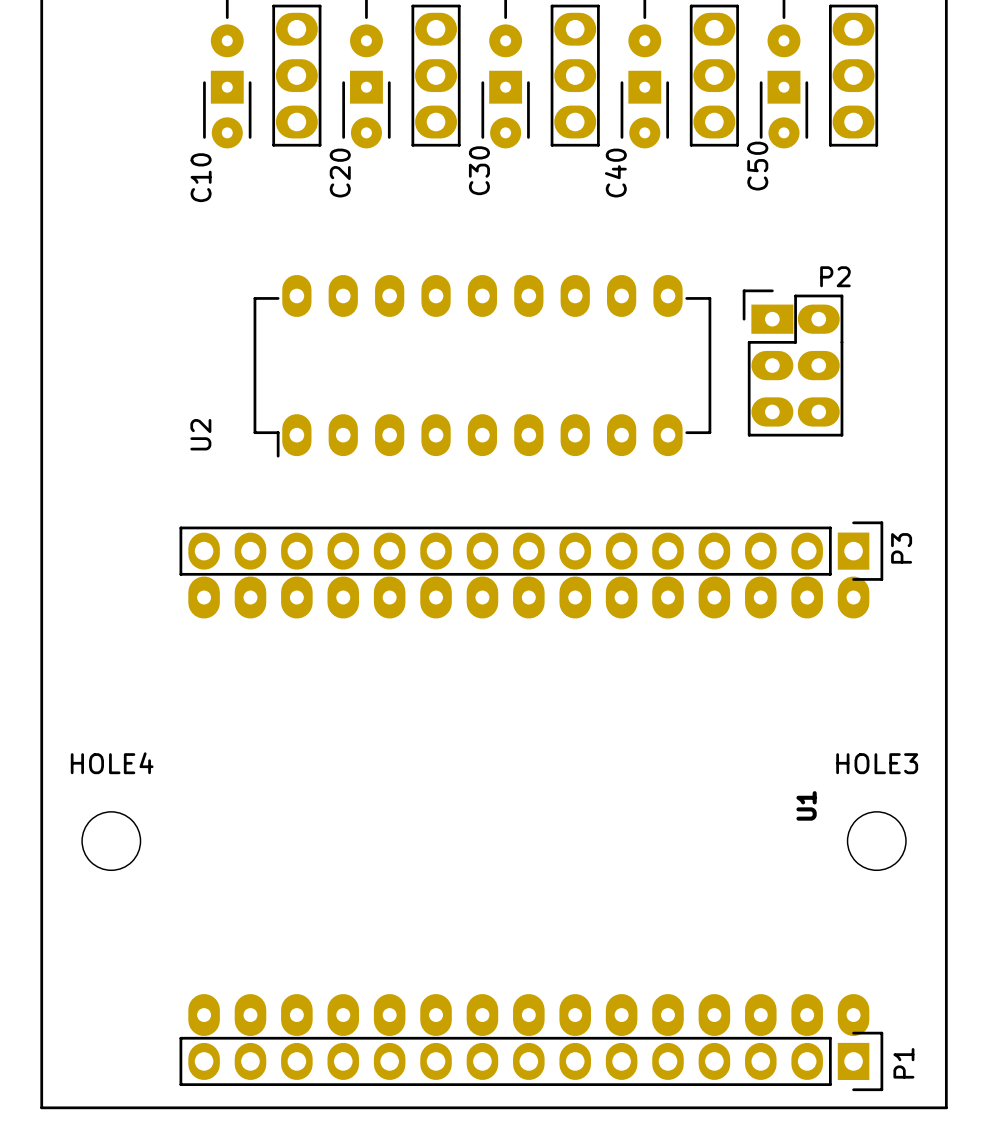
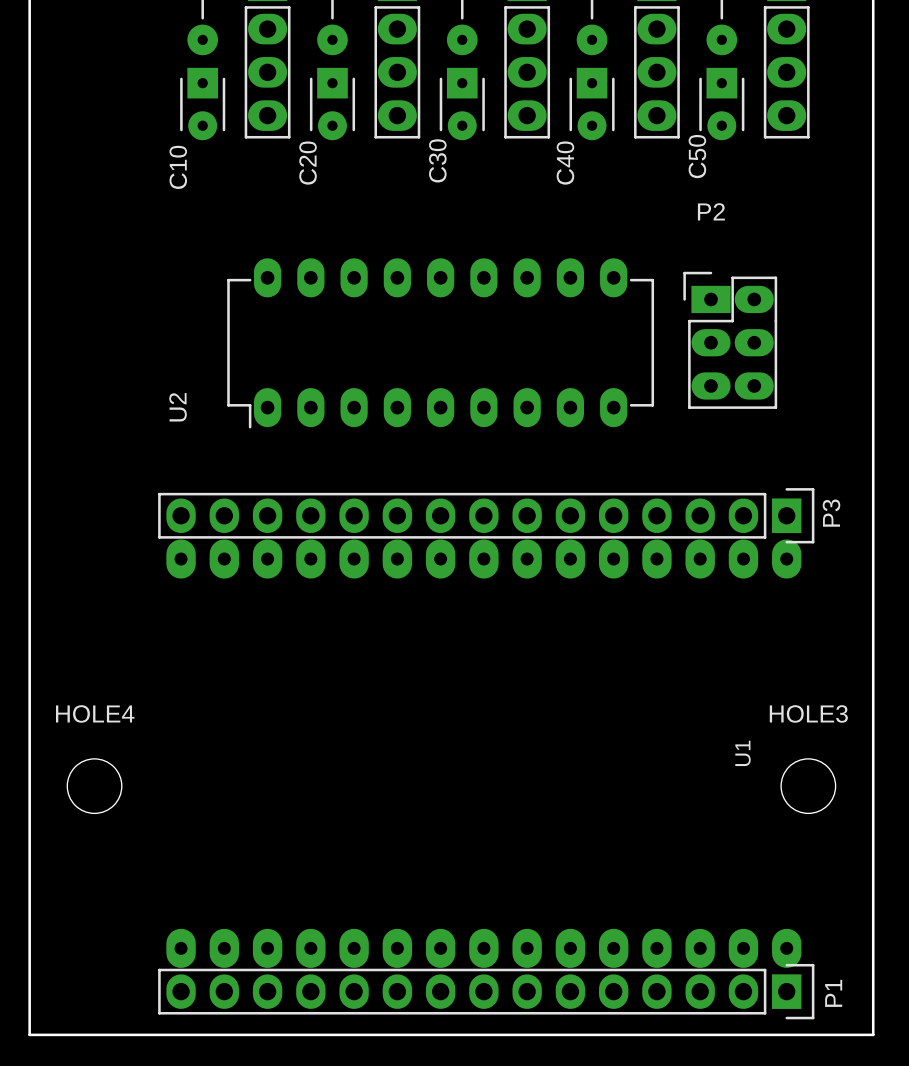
P2 name position: P2 (835, 276) -> P2 (711, 211)

